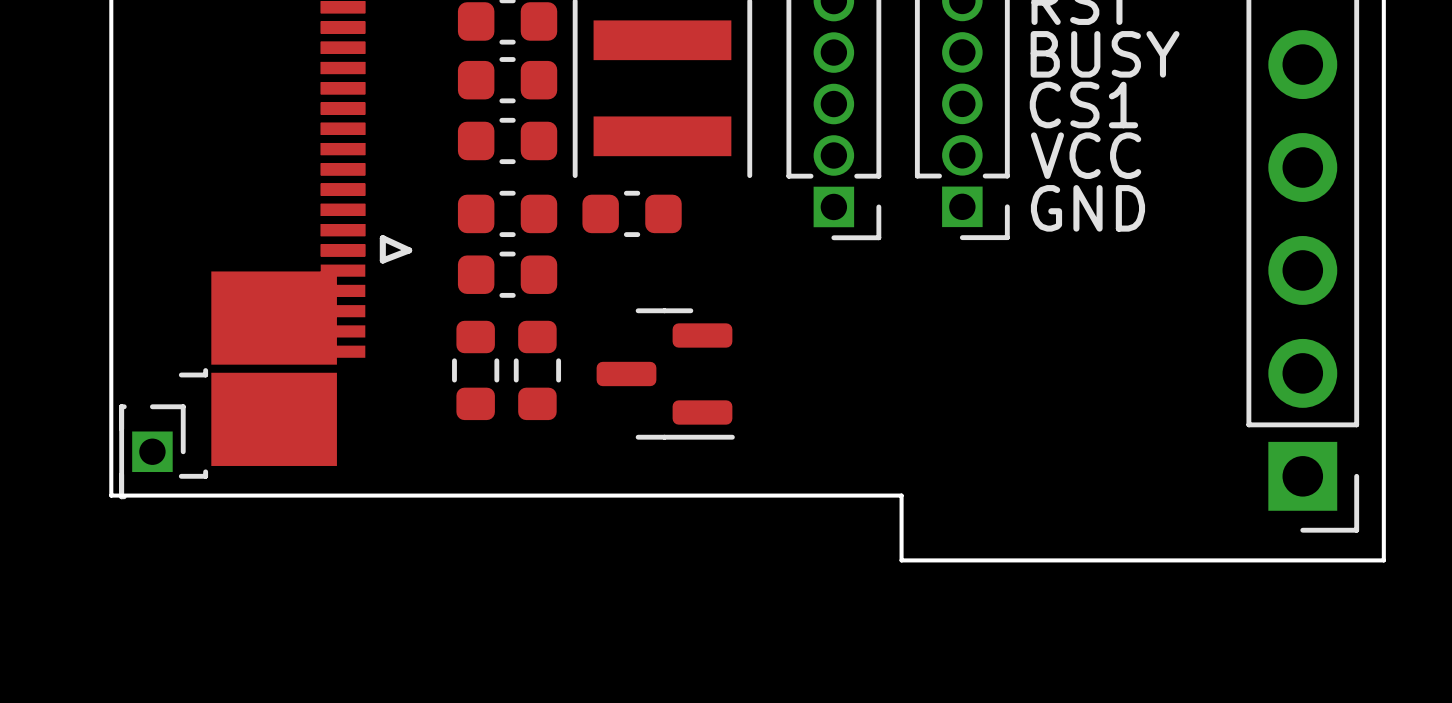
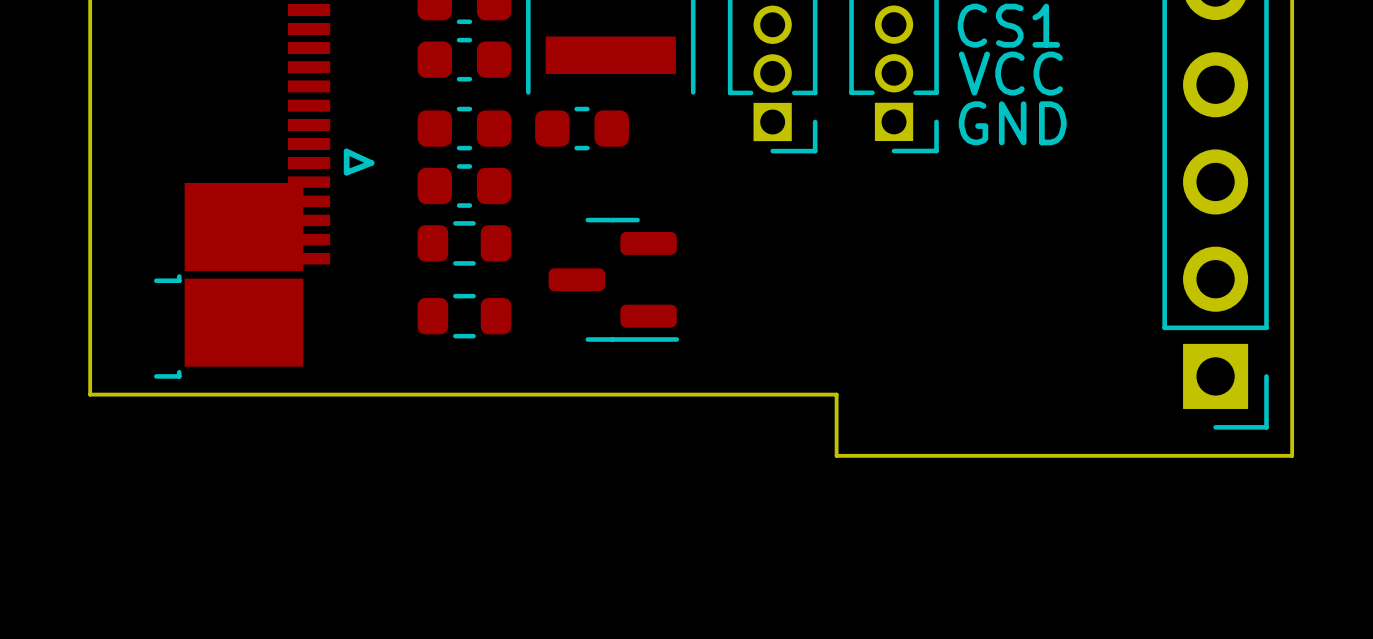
part: none -> (464, 243)
part: (475, 370) -> none
part: (537, 370) -> none
part: none -> (464, 316)
part: (152, 451) -> none

